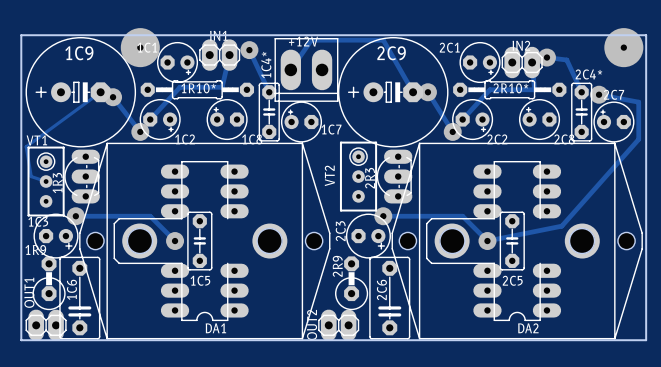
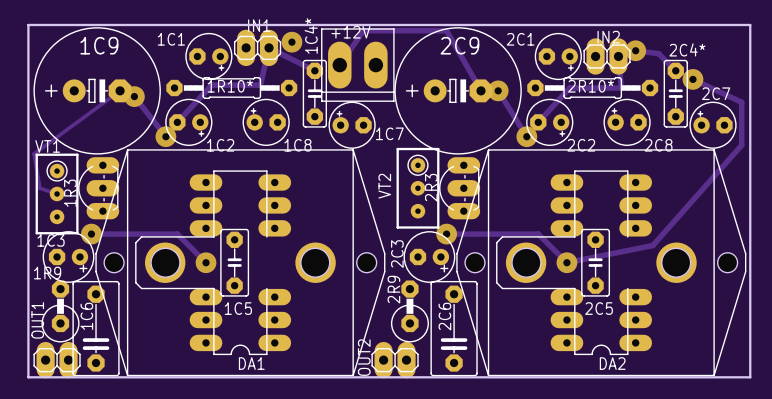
via: (140, 47) -> none
via: (623, 47) -> none
track: (249, 50) (269, 92) -> none
track: none -> (274, 50) (314, 70)
track: (566, 60) (581, 92) -> (658, 53) (675, 70)
track: (599, 94) (638, 102) -> (692, 79) (741, 102)
via position: (599, 94) -> (692, 79)
1C4* position: (269, 112) -> (314, 93)
2C4* position: (581, 112) -> (675, 93)

